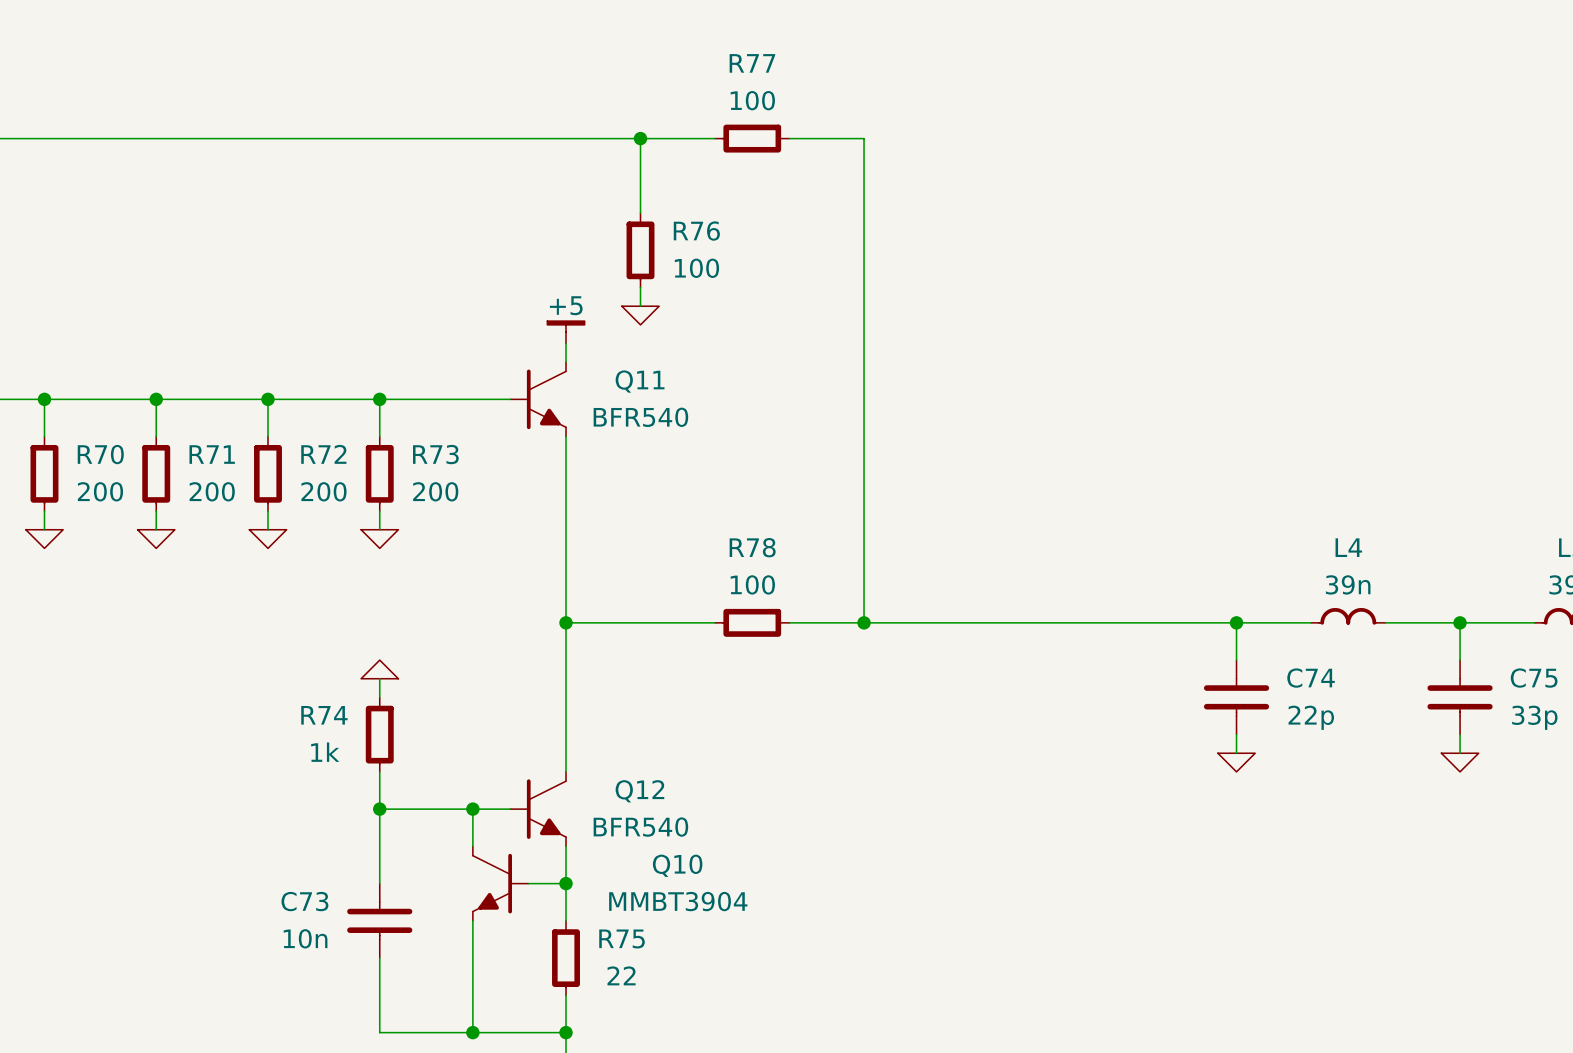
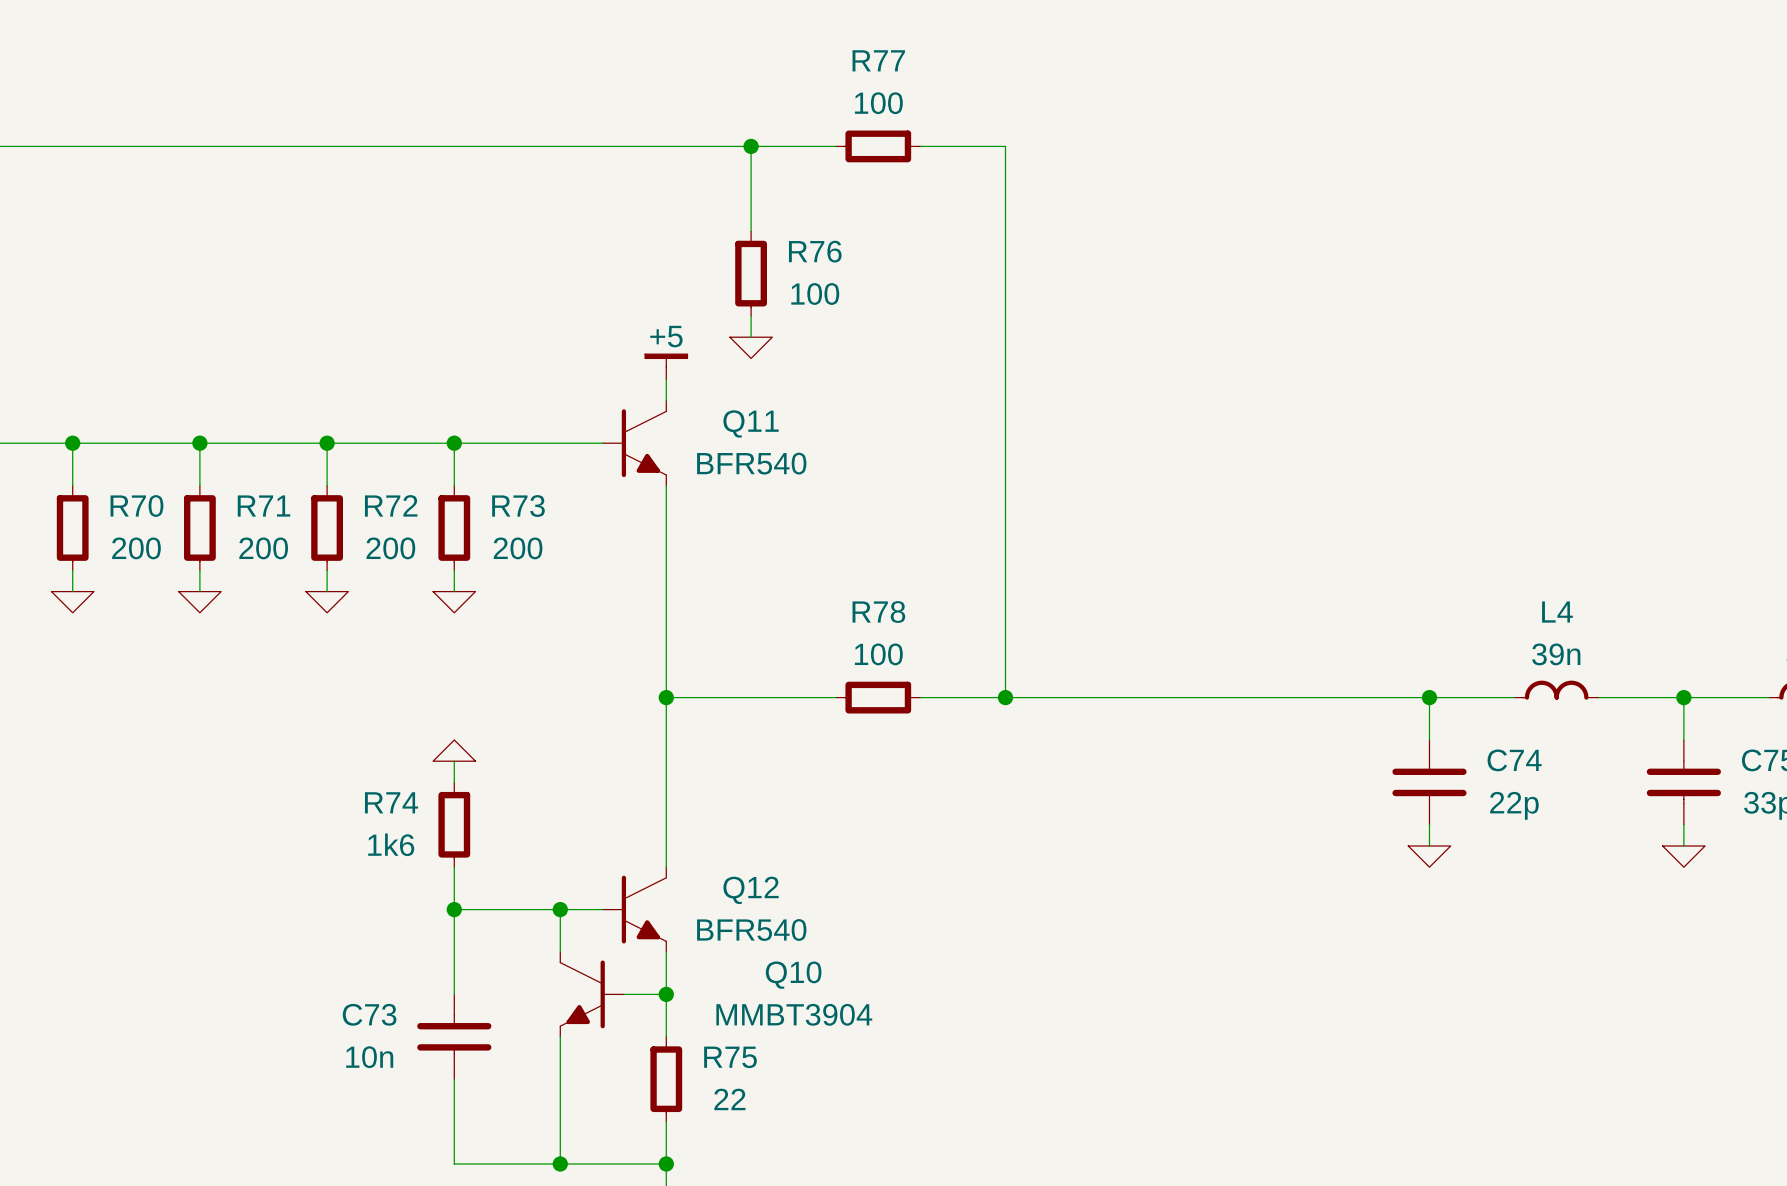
R74 value: 1k (325, 752) -> 1k6 (391, 844)

